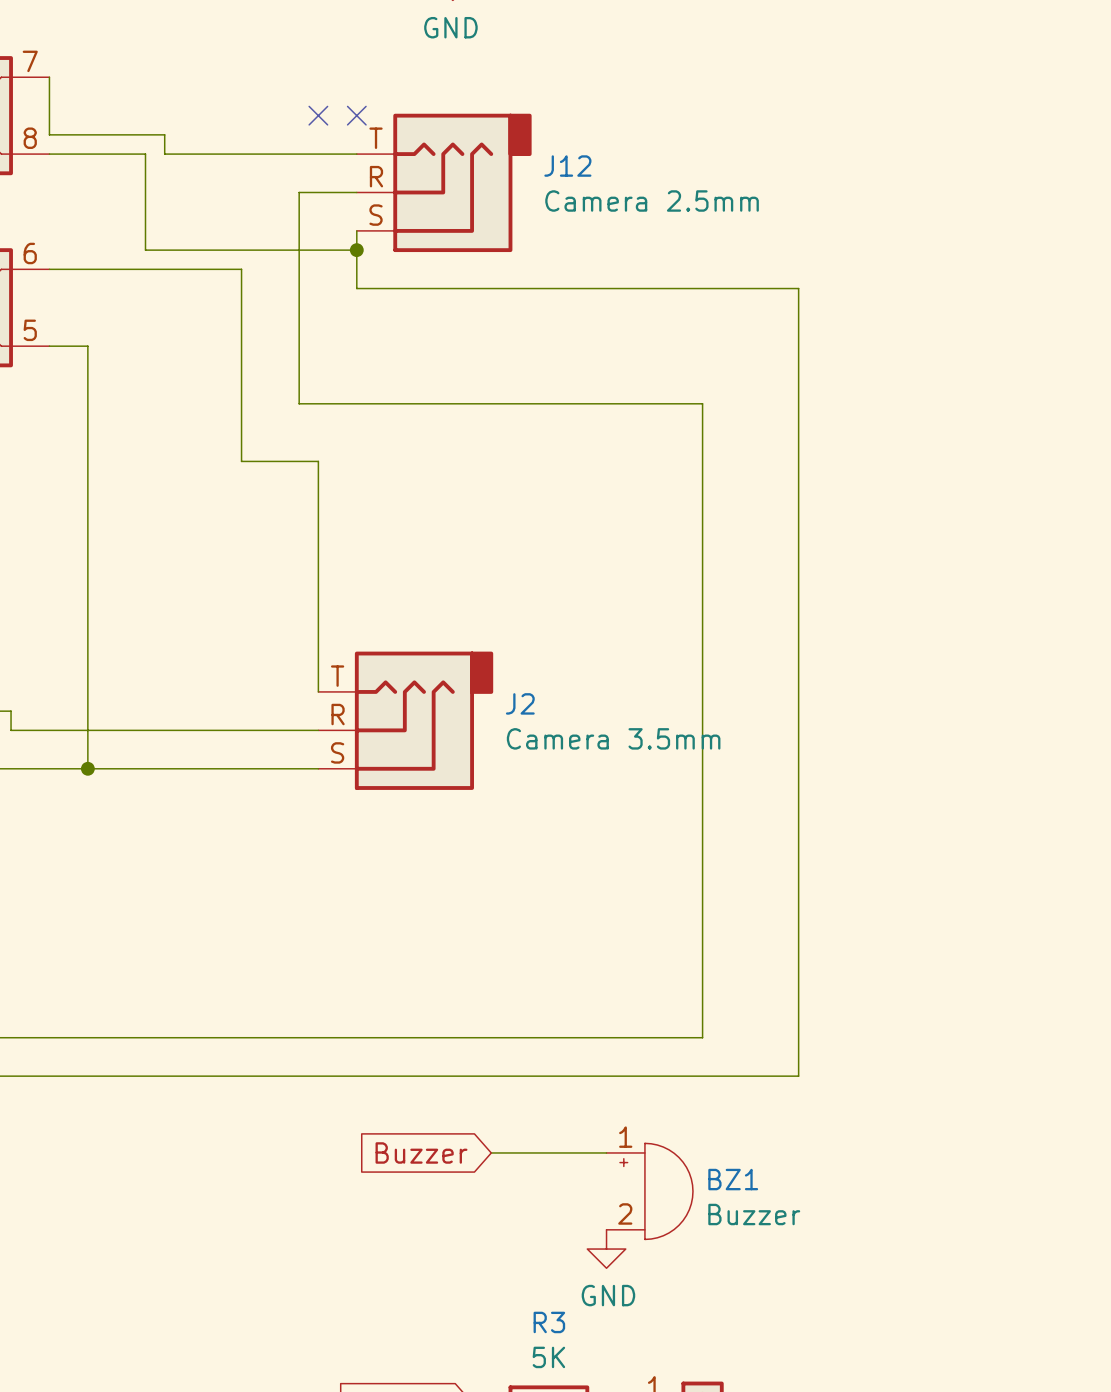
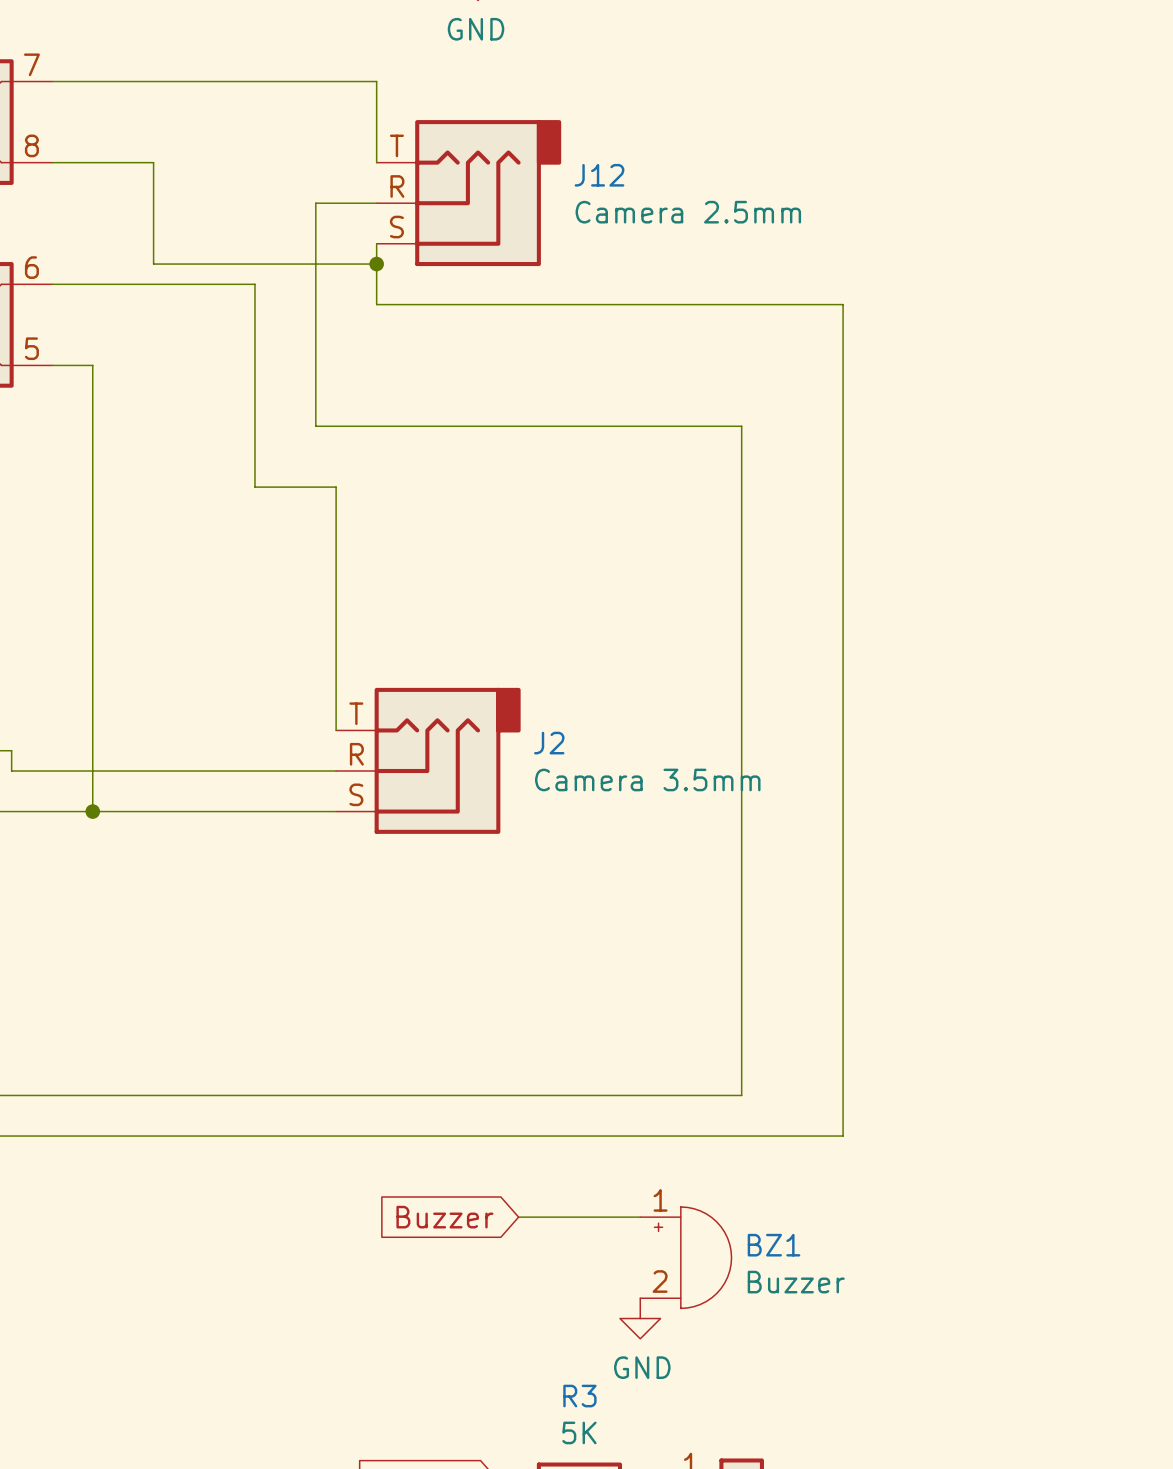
wire: (49, 77) (49, 134) (164, 134) (164, 154) (356, 154) -> (52, 81) (376, 81) (376, 162)
no-connect mark: (318, 115) -> none
no-connect mark: (356, 115) -> none

